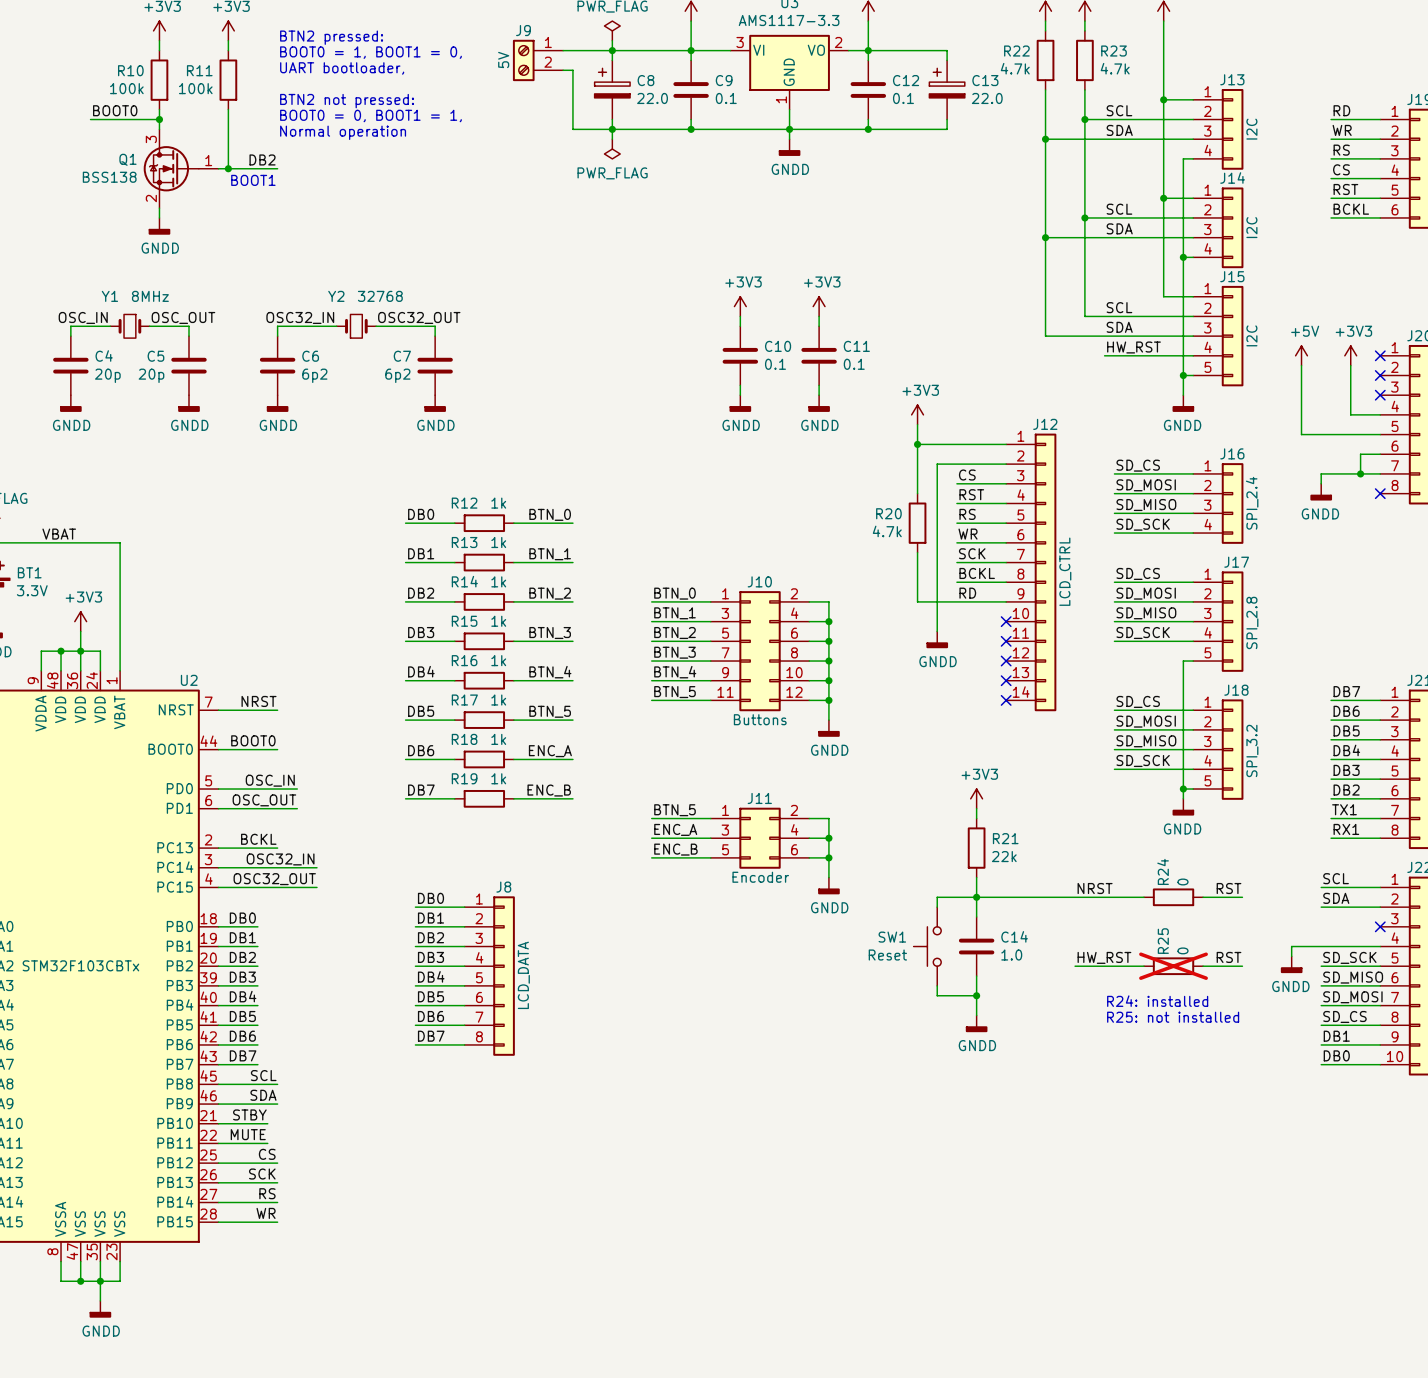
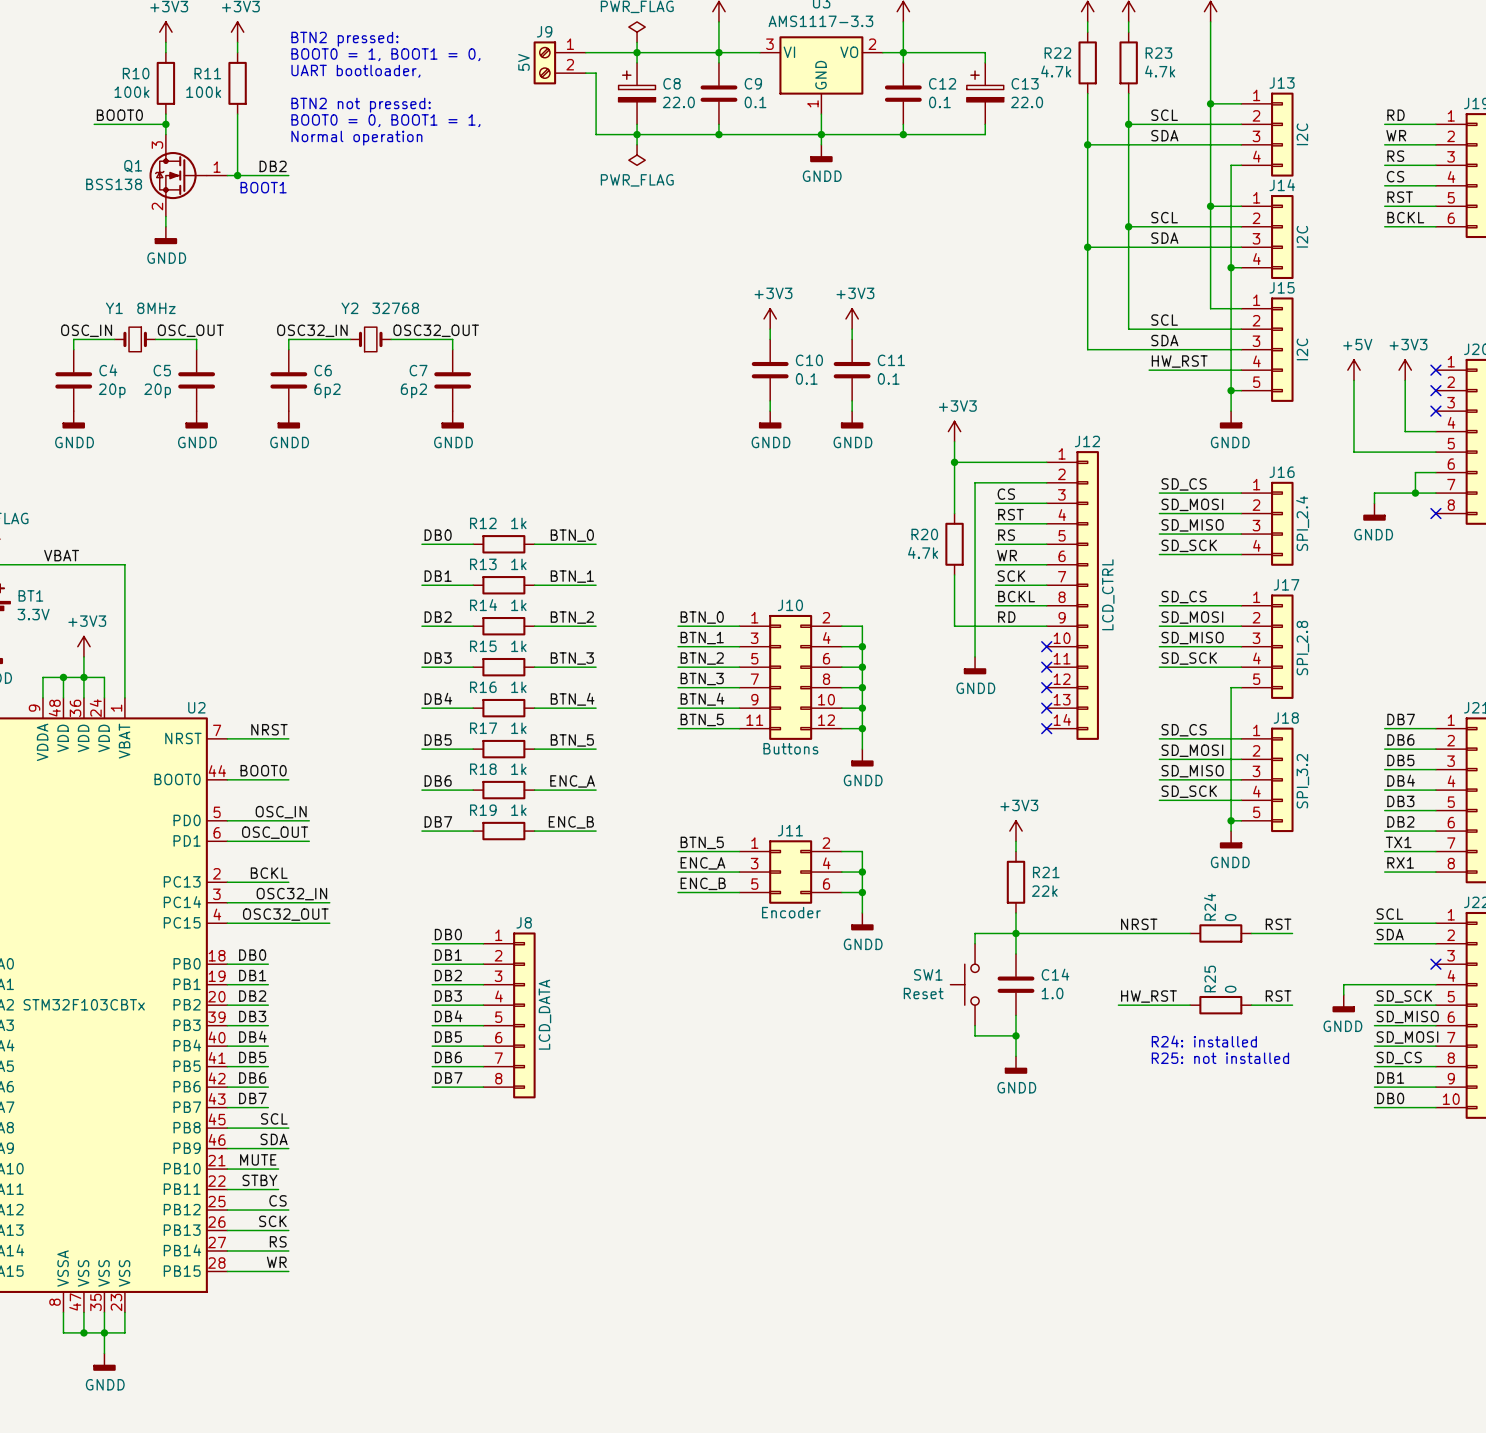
R25 do-not-place cross: (1173, 966) -> none
label: STBY (249, 1114) -> MUTE (258, 1159)
label: MUTE (248, 1134) -> STBY (259, 1180)

